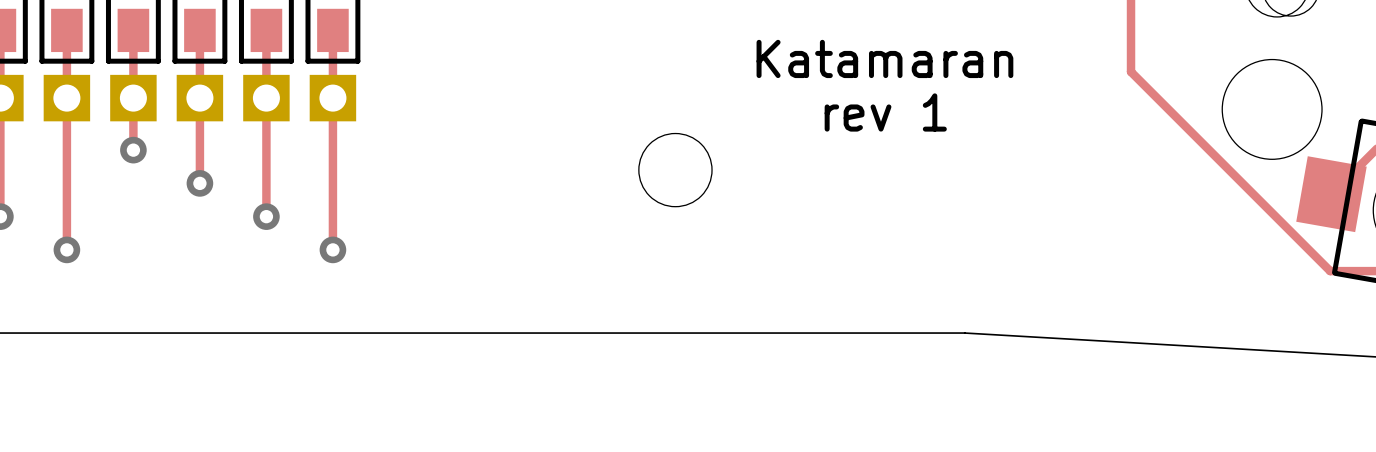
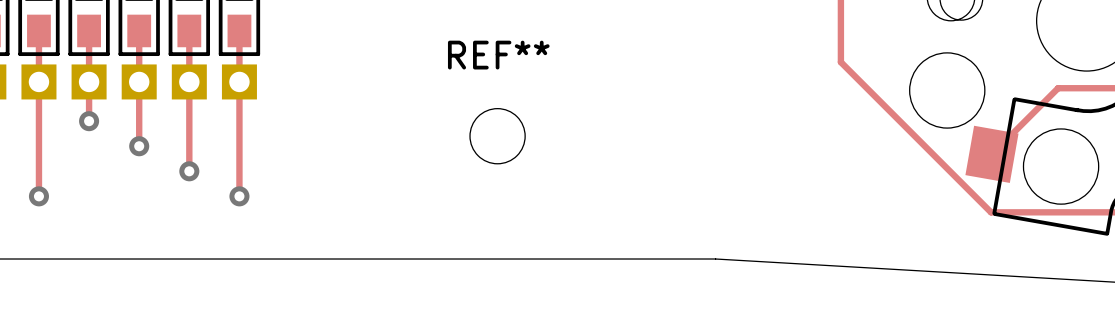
text: Katamaran (884, 58) -> none
REF** name: none -> REF** (498, 55)
text: rev 1 (885, 112) -> none

